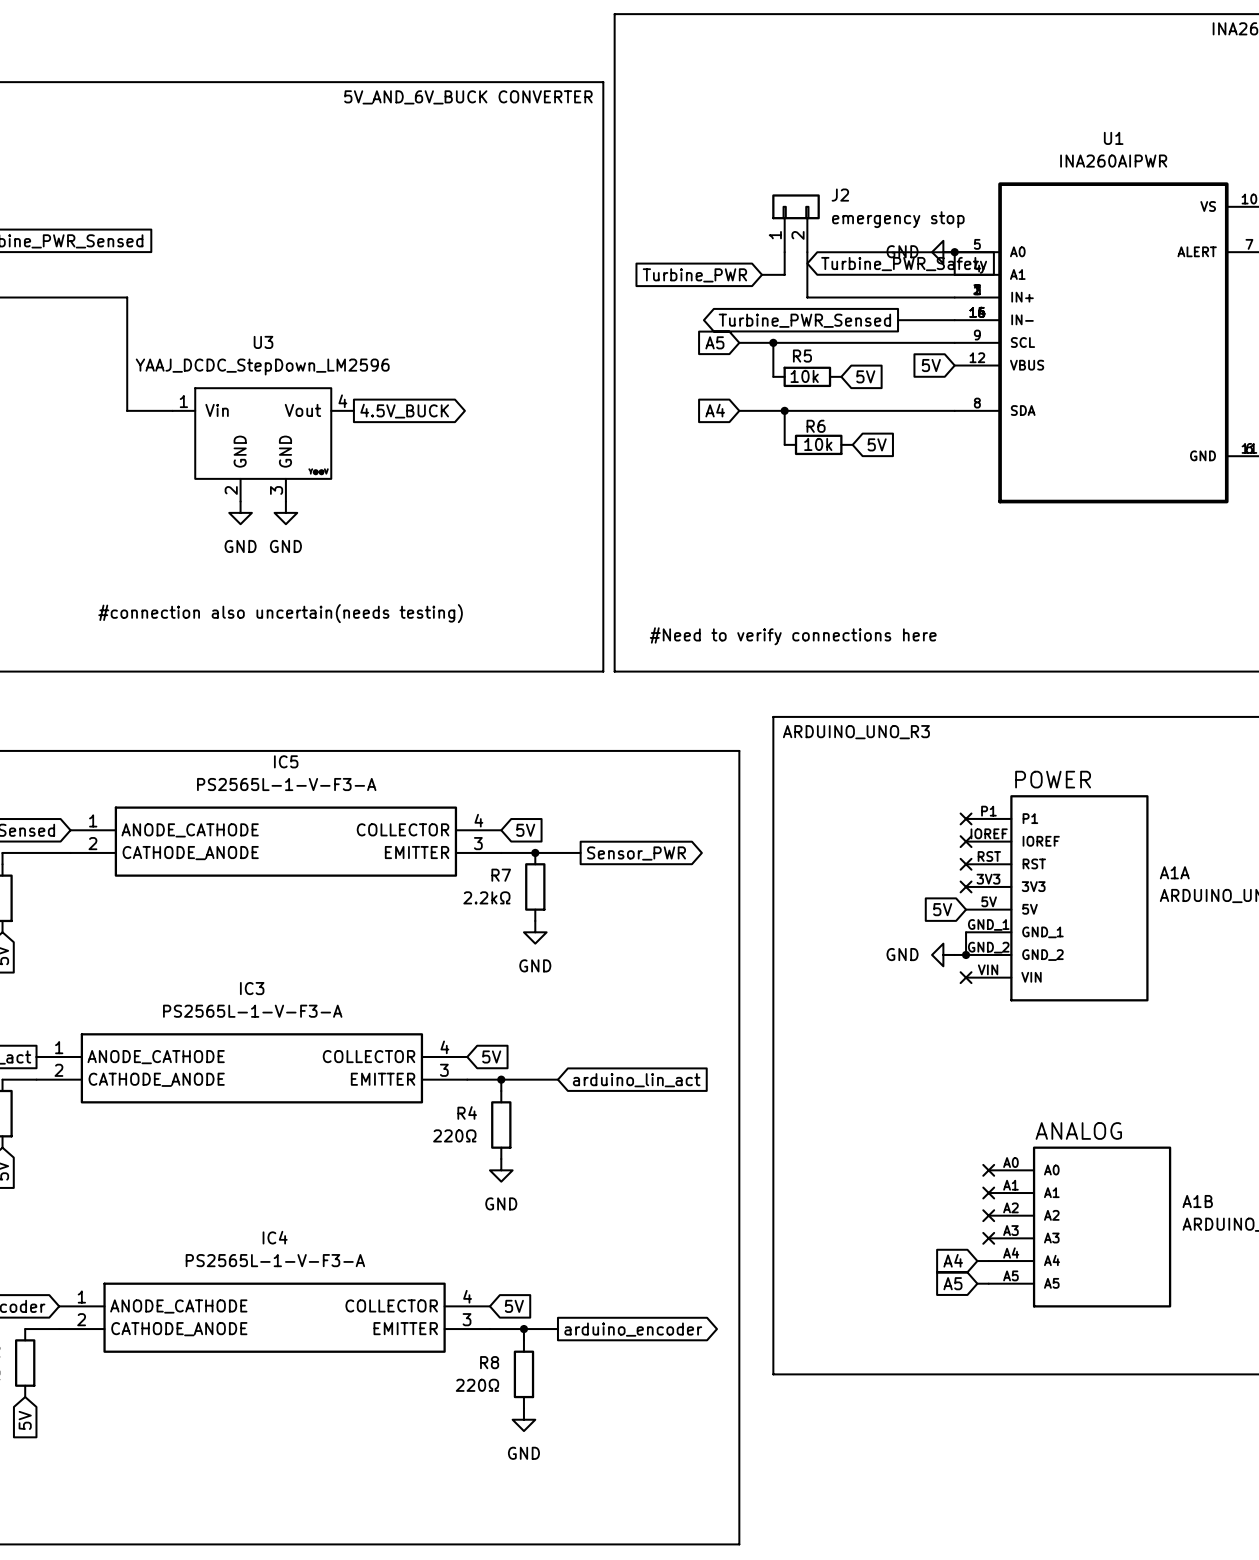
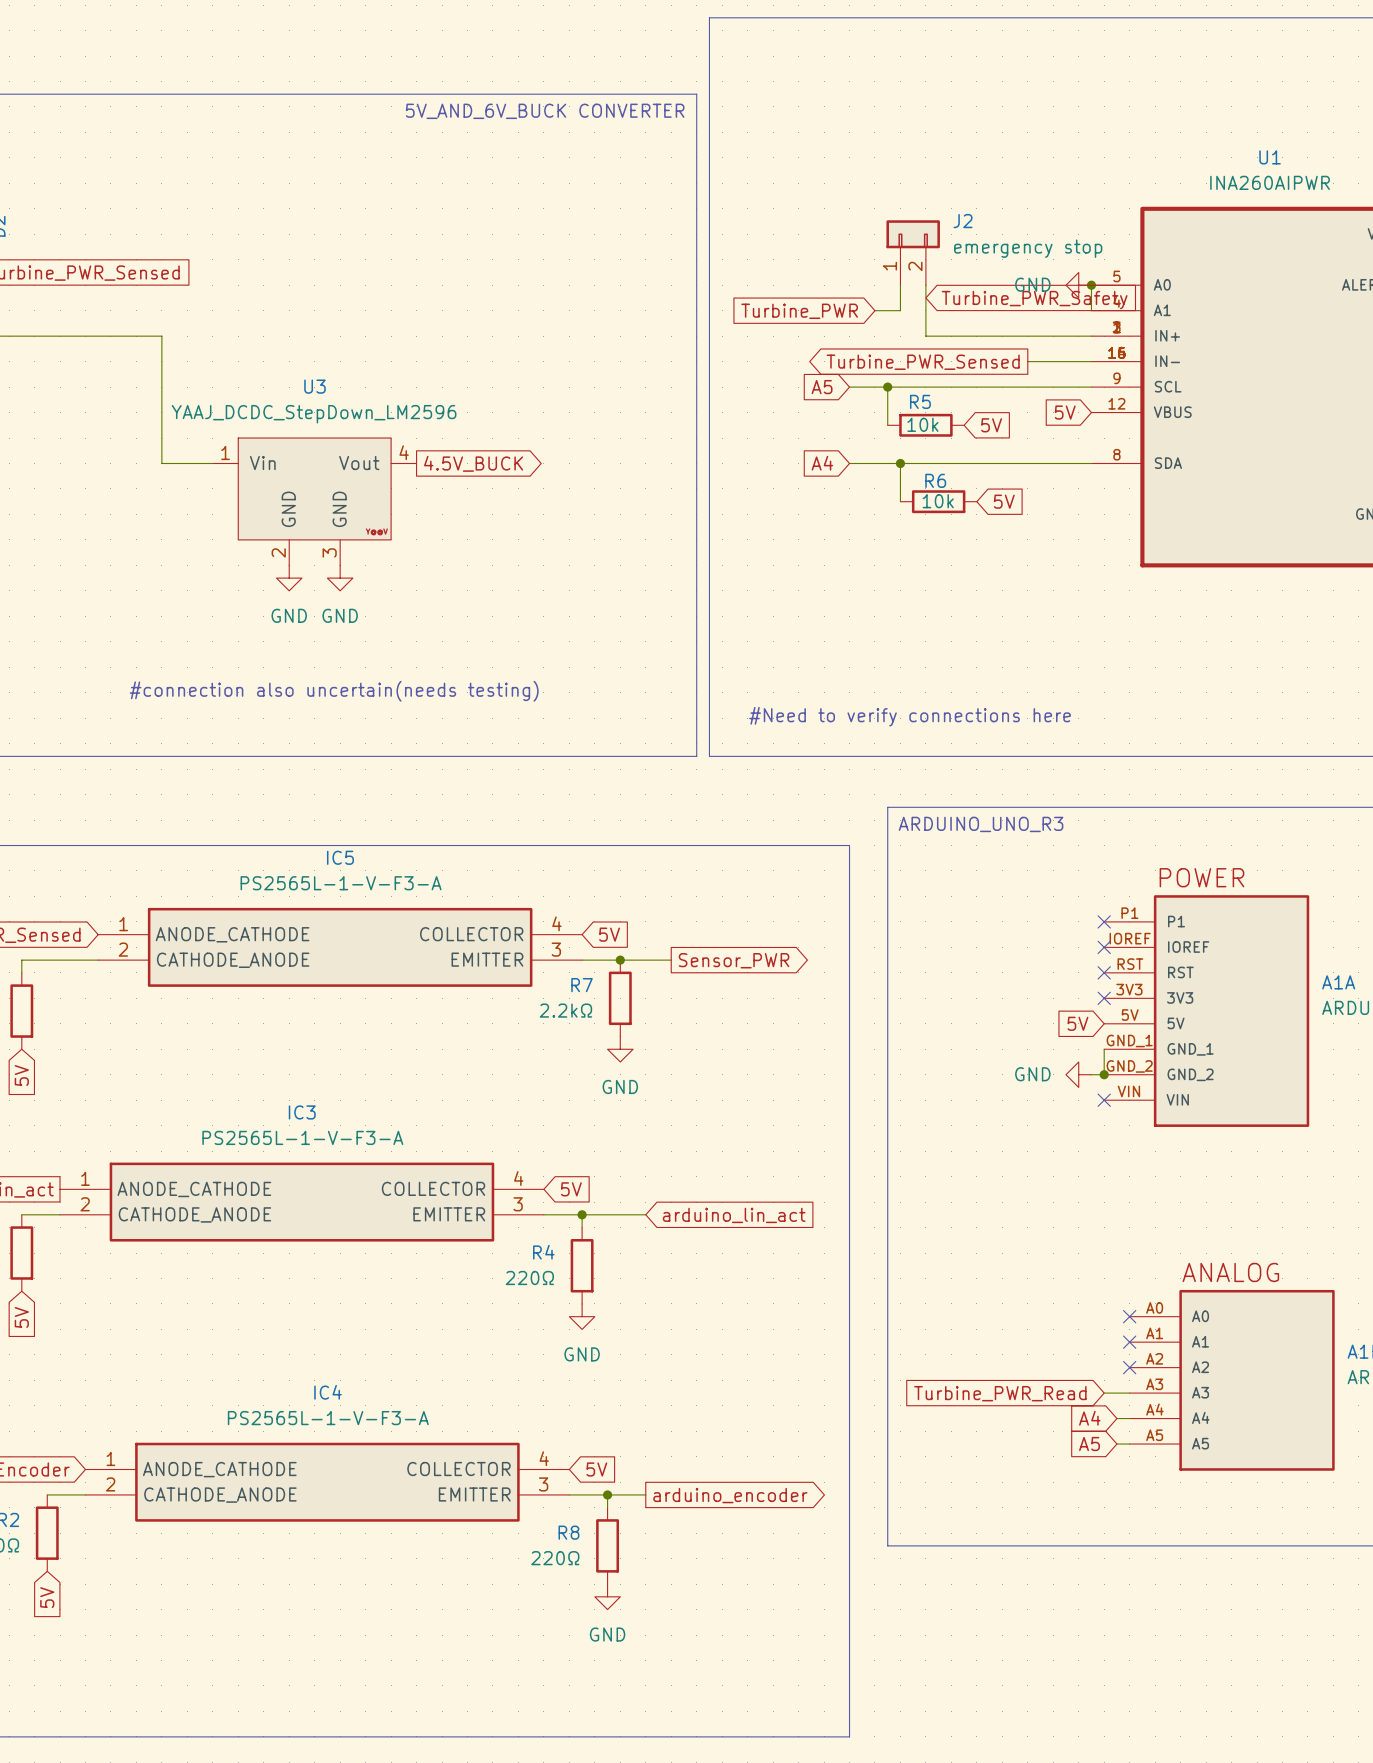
global label: none -> Turbine_PWR_Read (1000, 1393)
wire: none -> (1104, 1393) (1129, 1393)
no-connect mark: (988, 1238) -> none

